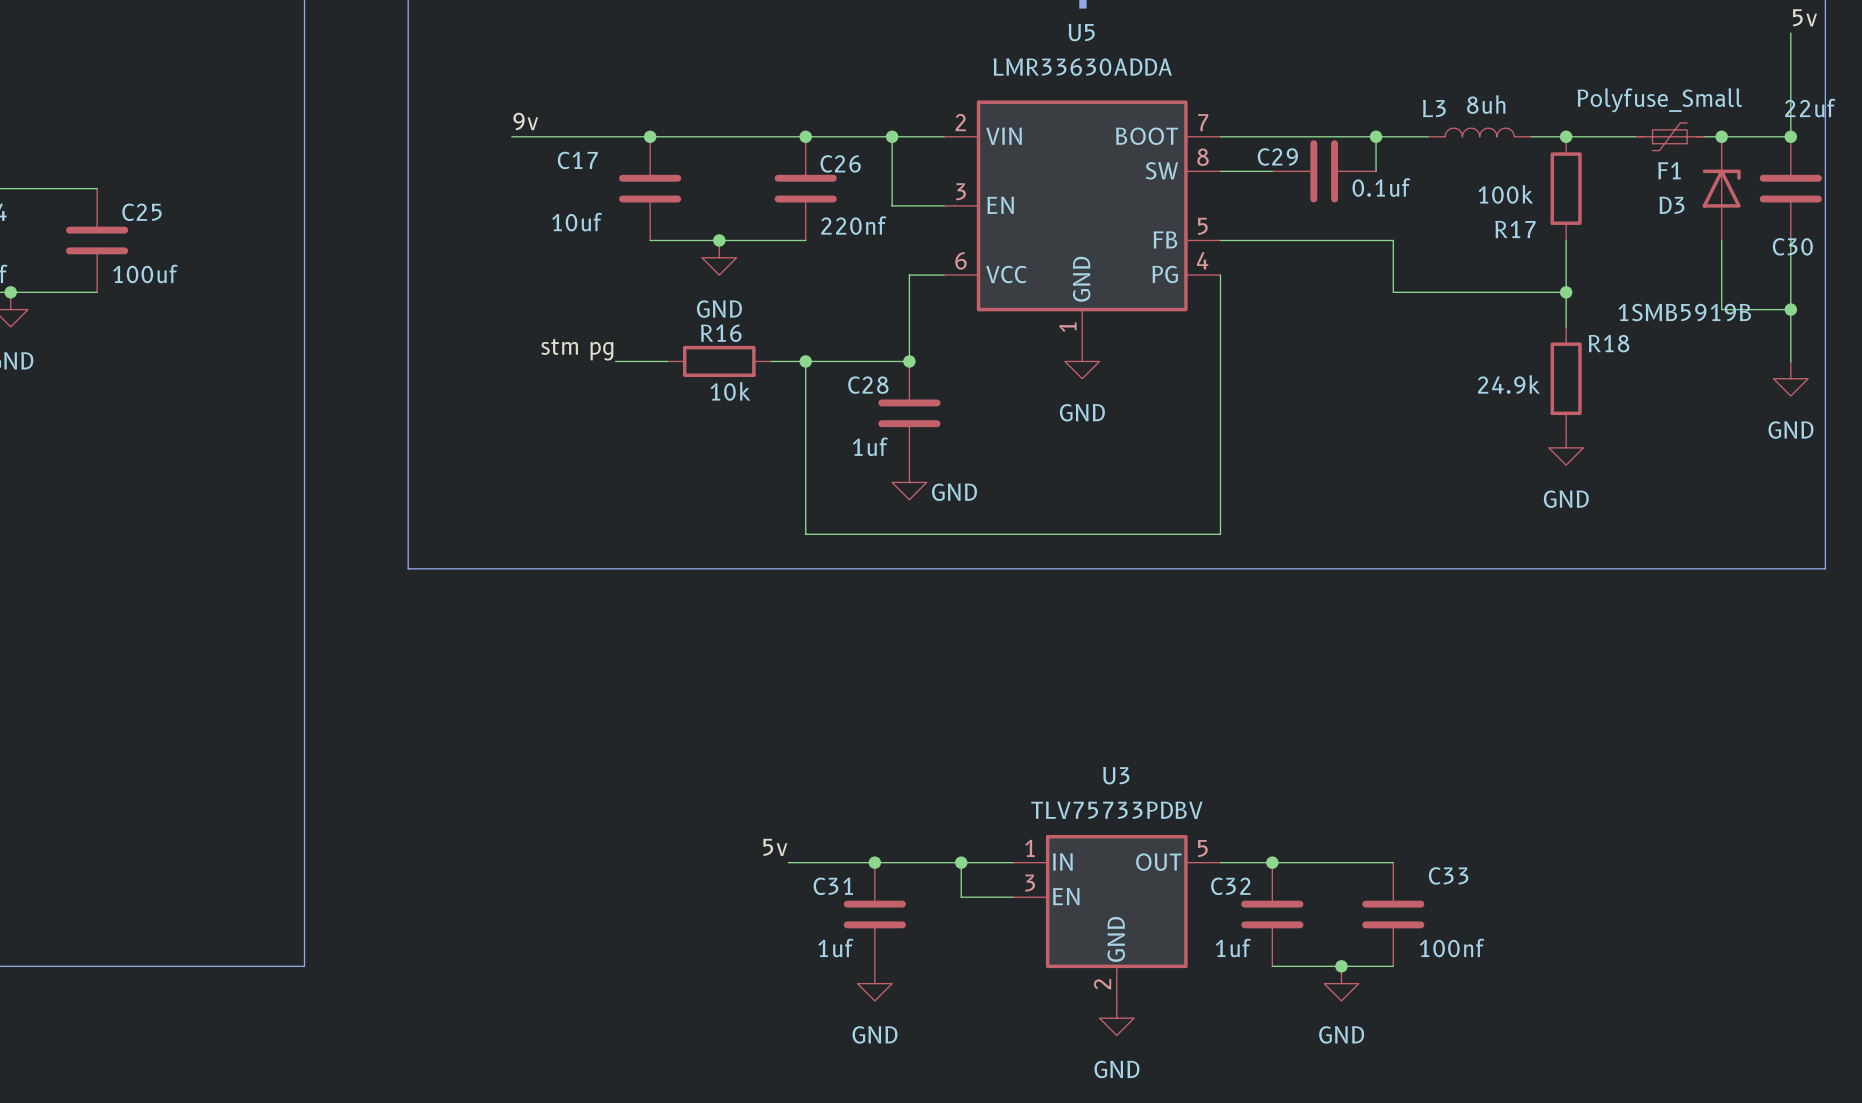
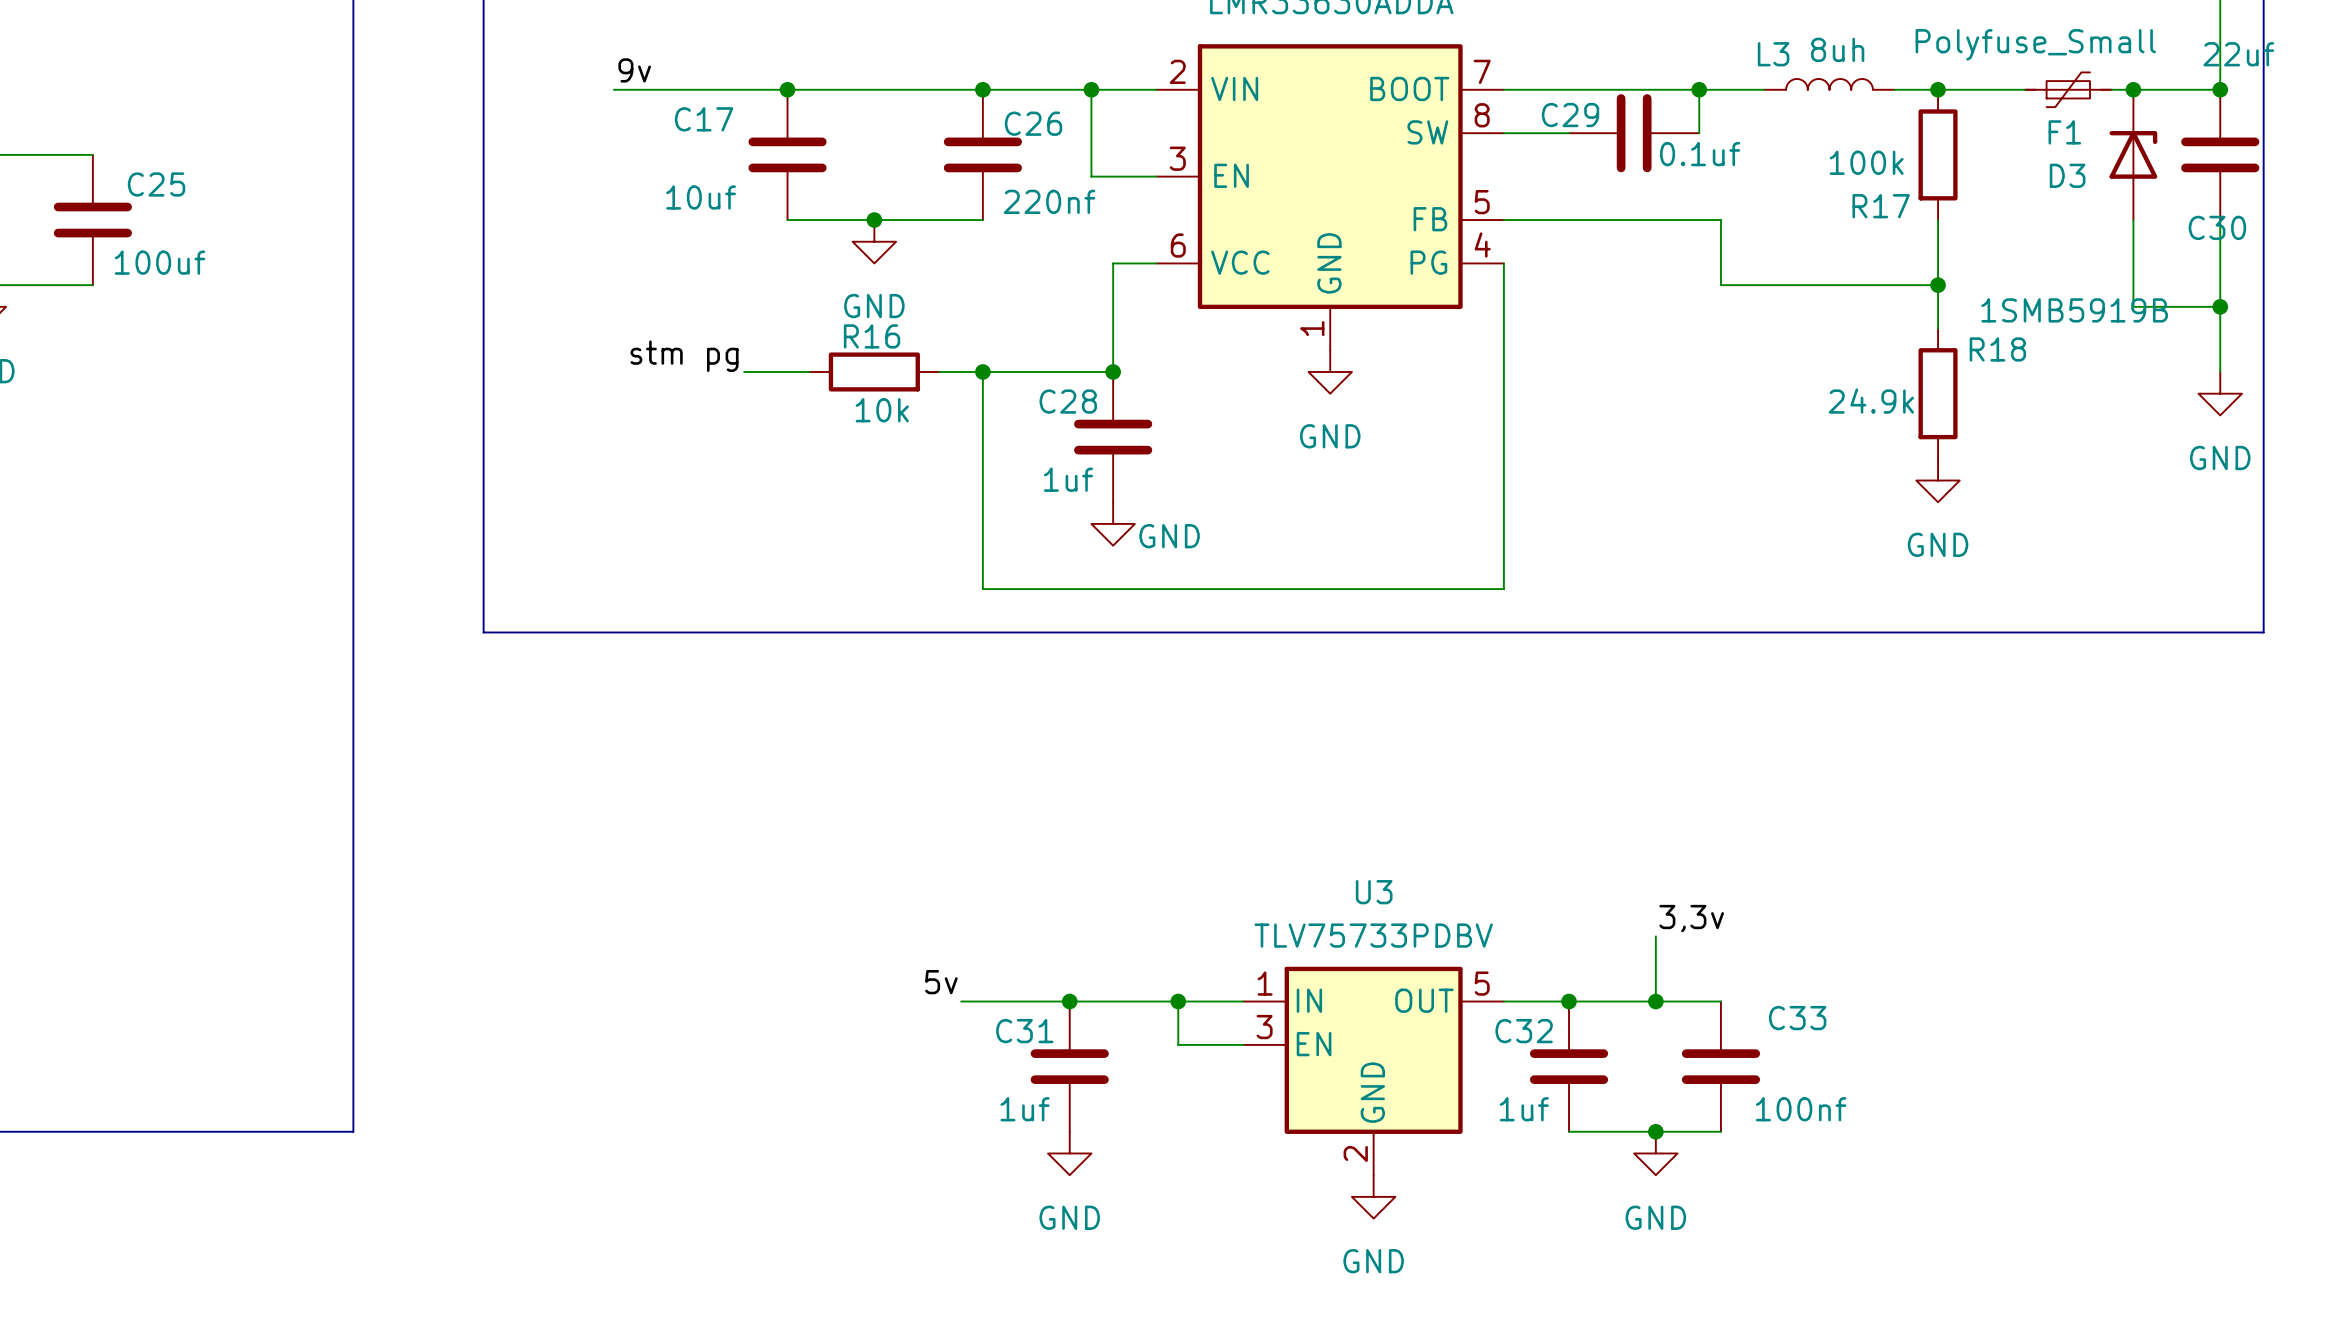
label: none -> 3,3v (1691, 918)
wire: none -> (1655, 936) (1655, 1001)
junction: none -> (1655, 1001)

